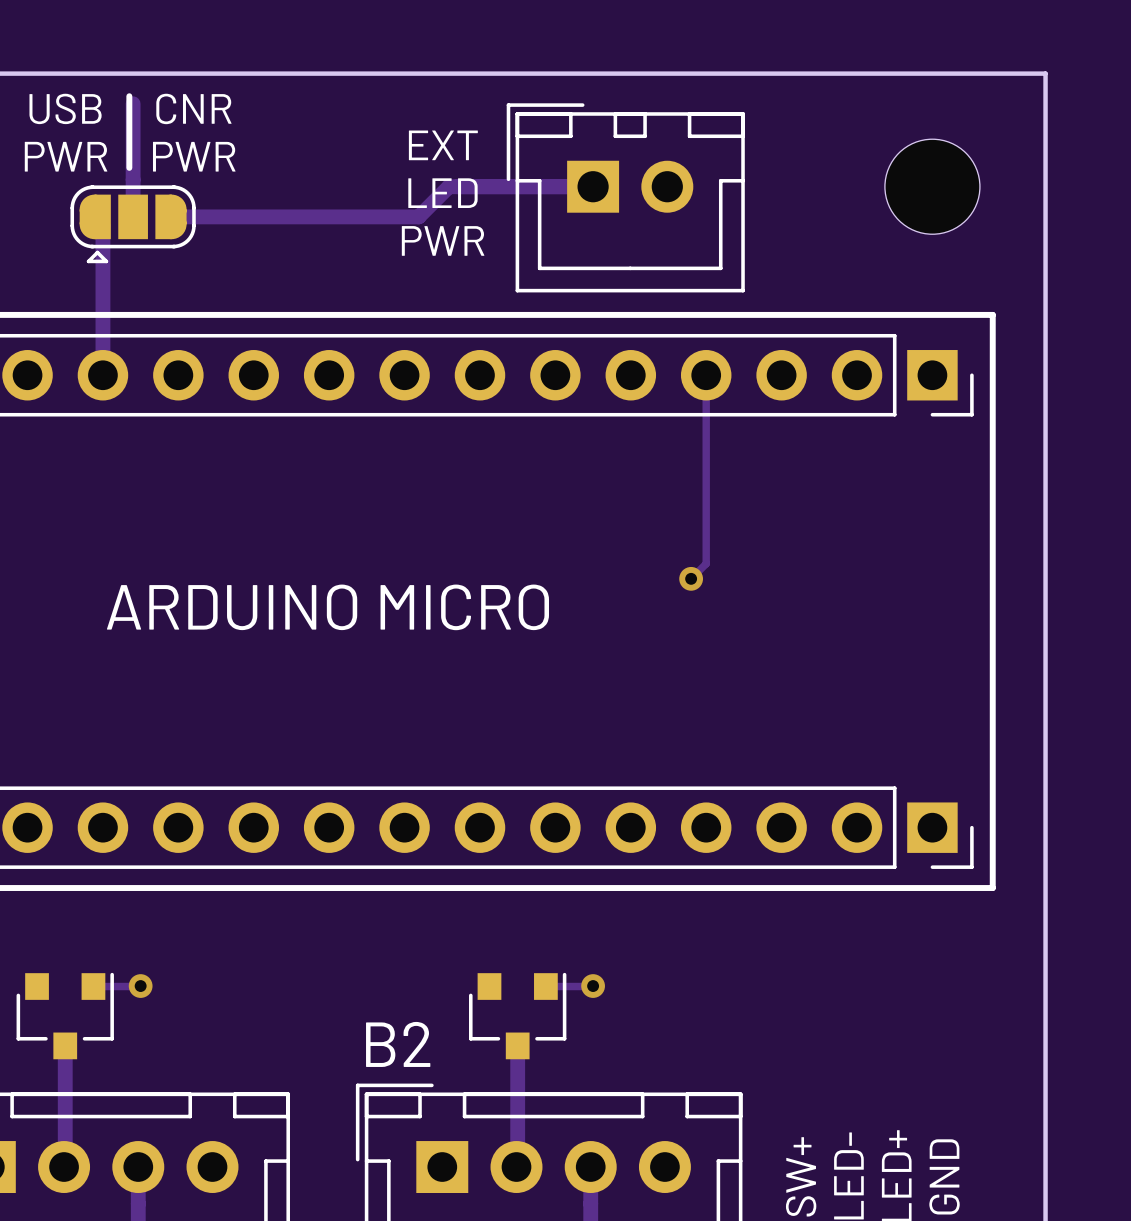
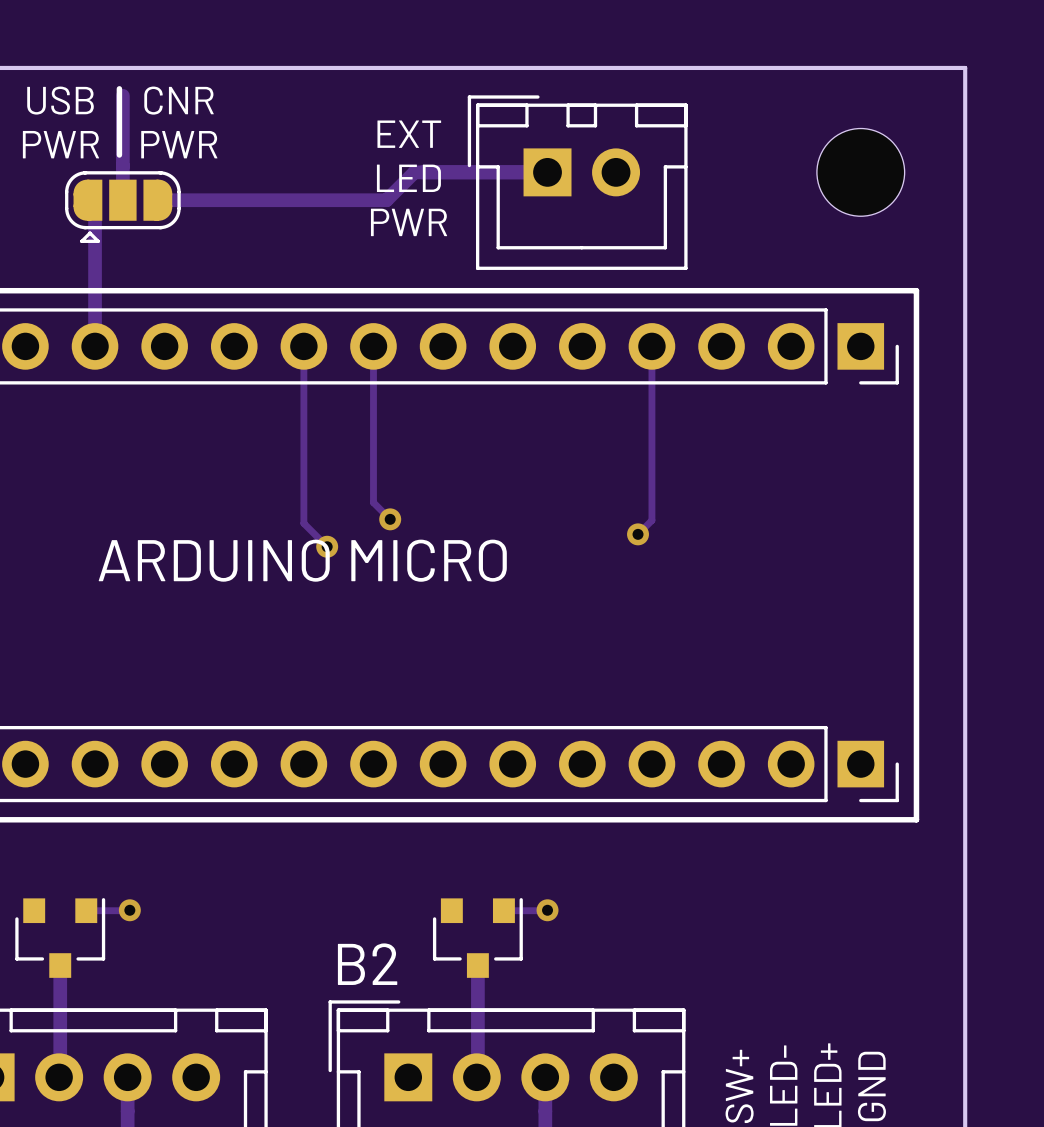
track: none -> (303, 346) (303, 523) (327, 546)
track: none -> (373, 346) (373, 502) (390, 519)
via: none -> (390, 519)
via: none -> (327, 546)

